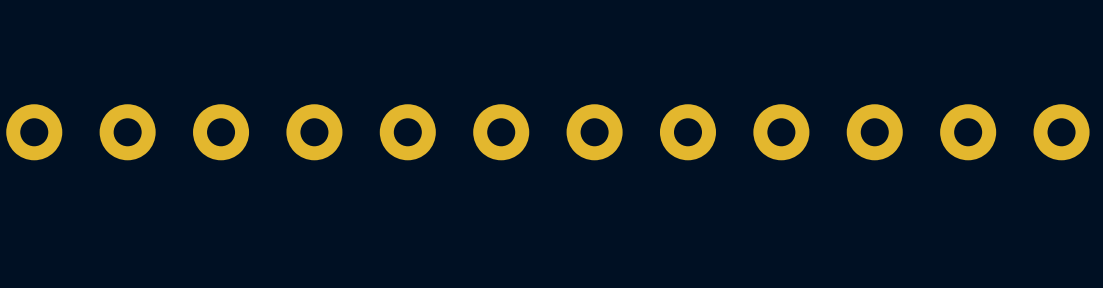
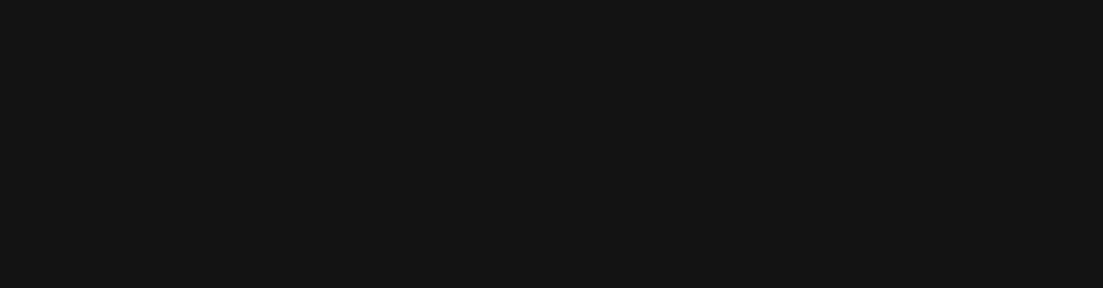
part: (547, 132) -> none

